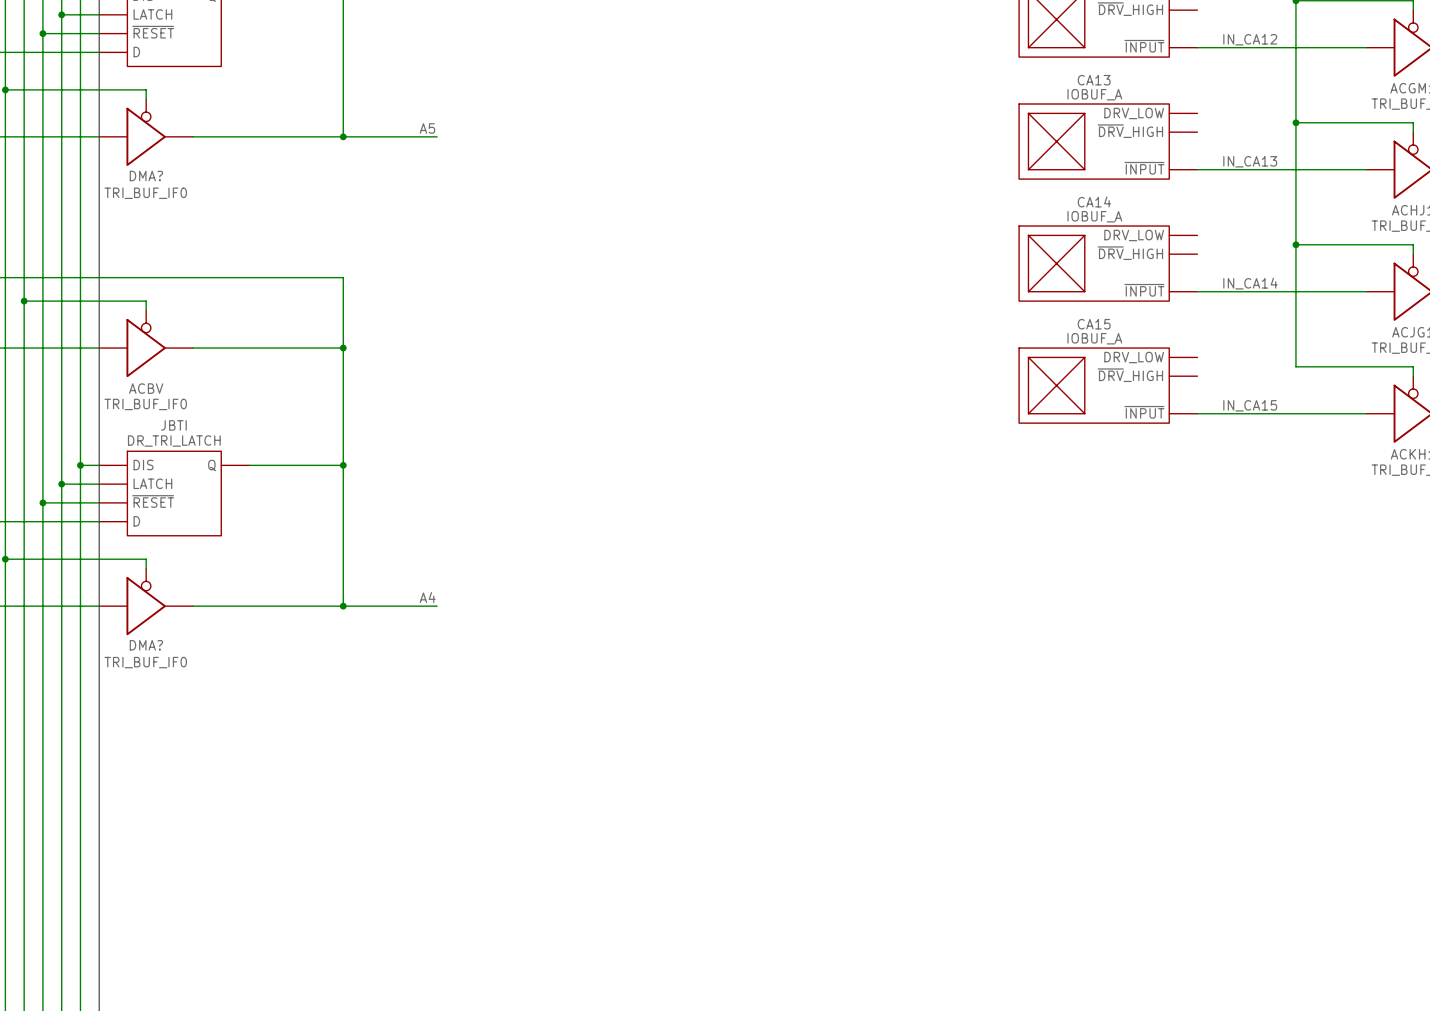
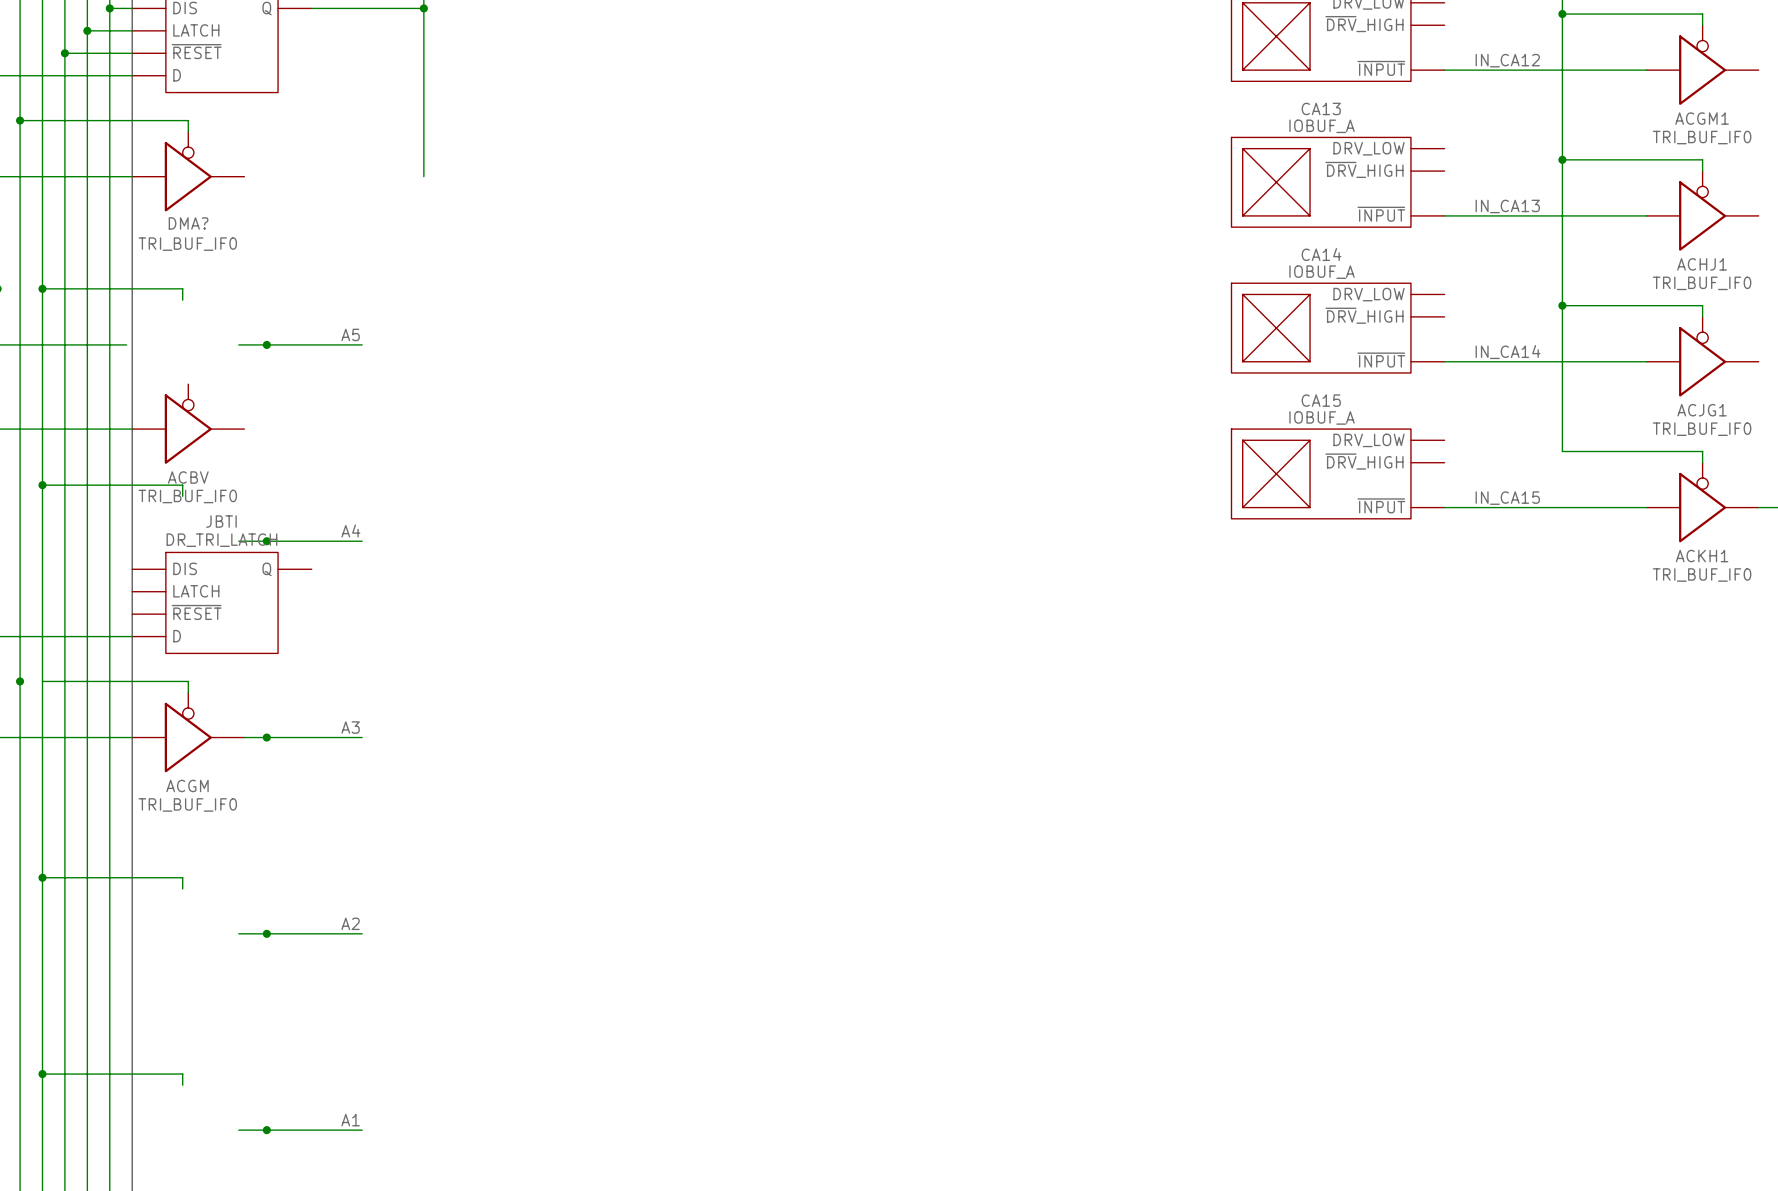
label: A5 (427, 128) -> none
wire: (193, 136) (437, 136) -> none
junction: (343, 136) -> none
wire: none -> (42, 288) (182, 288) (182, 300)
junction: none -> (42, 288)
label: none -> A5 (350, 334)
wire: (94, 277) (188, 277) -> none
junction: none -> (266, 344)
wire: (291, 277) (343, 277) (343, 606) -> none
wire: (24, 301) (146, 301) (146, 310) -> none
junction: (24, 301) -> none
wire: (193, 348) (343, 348) -> none
junction: (343, 348) -> none
wire: none -> (42, 485) (182, 485) (182, 496)
junction: none -> (42, 485)
label: none -> A4 (350, 530)
wire: none -> (238, 541) (362, 541)
junction: none -> (266, 541)
wire: (80, 465) (99, 465) -> none
junction: (80, 465) -> none
wire: (249, 465) (343, 465) -> none
junction: (343, 465) -> none
wire: (61, 484) (99, 484) -> none
junction: (61, 484) -> none
wire: (42, 502) (99, 502) -> none
junction: (42, 502) -> none
wire: (5, 559) (24, 559) -> none
label: none -> A3 (350, 727)
label: A4 (427, 597) -> none
junction: none -> (266, 737)
wire: (291, 606) (437, 606) -> none
junction: (343, 606) -> none
DMA? name: DMA? (146, 645) -> ACGM (187, 785)
wire: none -> (42, 877) (182, 877) (182, 888)
junction: none -> (42, 877)
label: none -> A2 (350, 923)
wire: none -> (238, 933) (362, 933)
junction: none -> (266, 933)
wire: none -> (42, 1074) (182, 1074) (182, 1085)
junction: none -> (42, 1074)
label: none -> A1 (350, 1120)
wire: none -> (238, 1130) (362, 1130)
junction: none -> (266, 1130)

